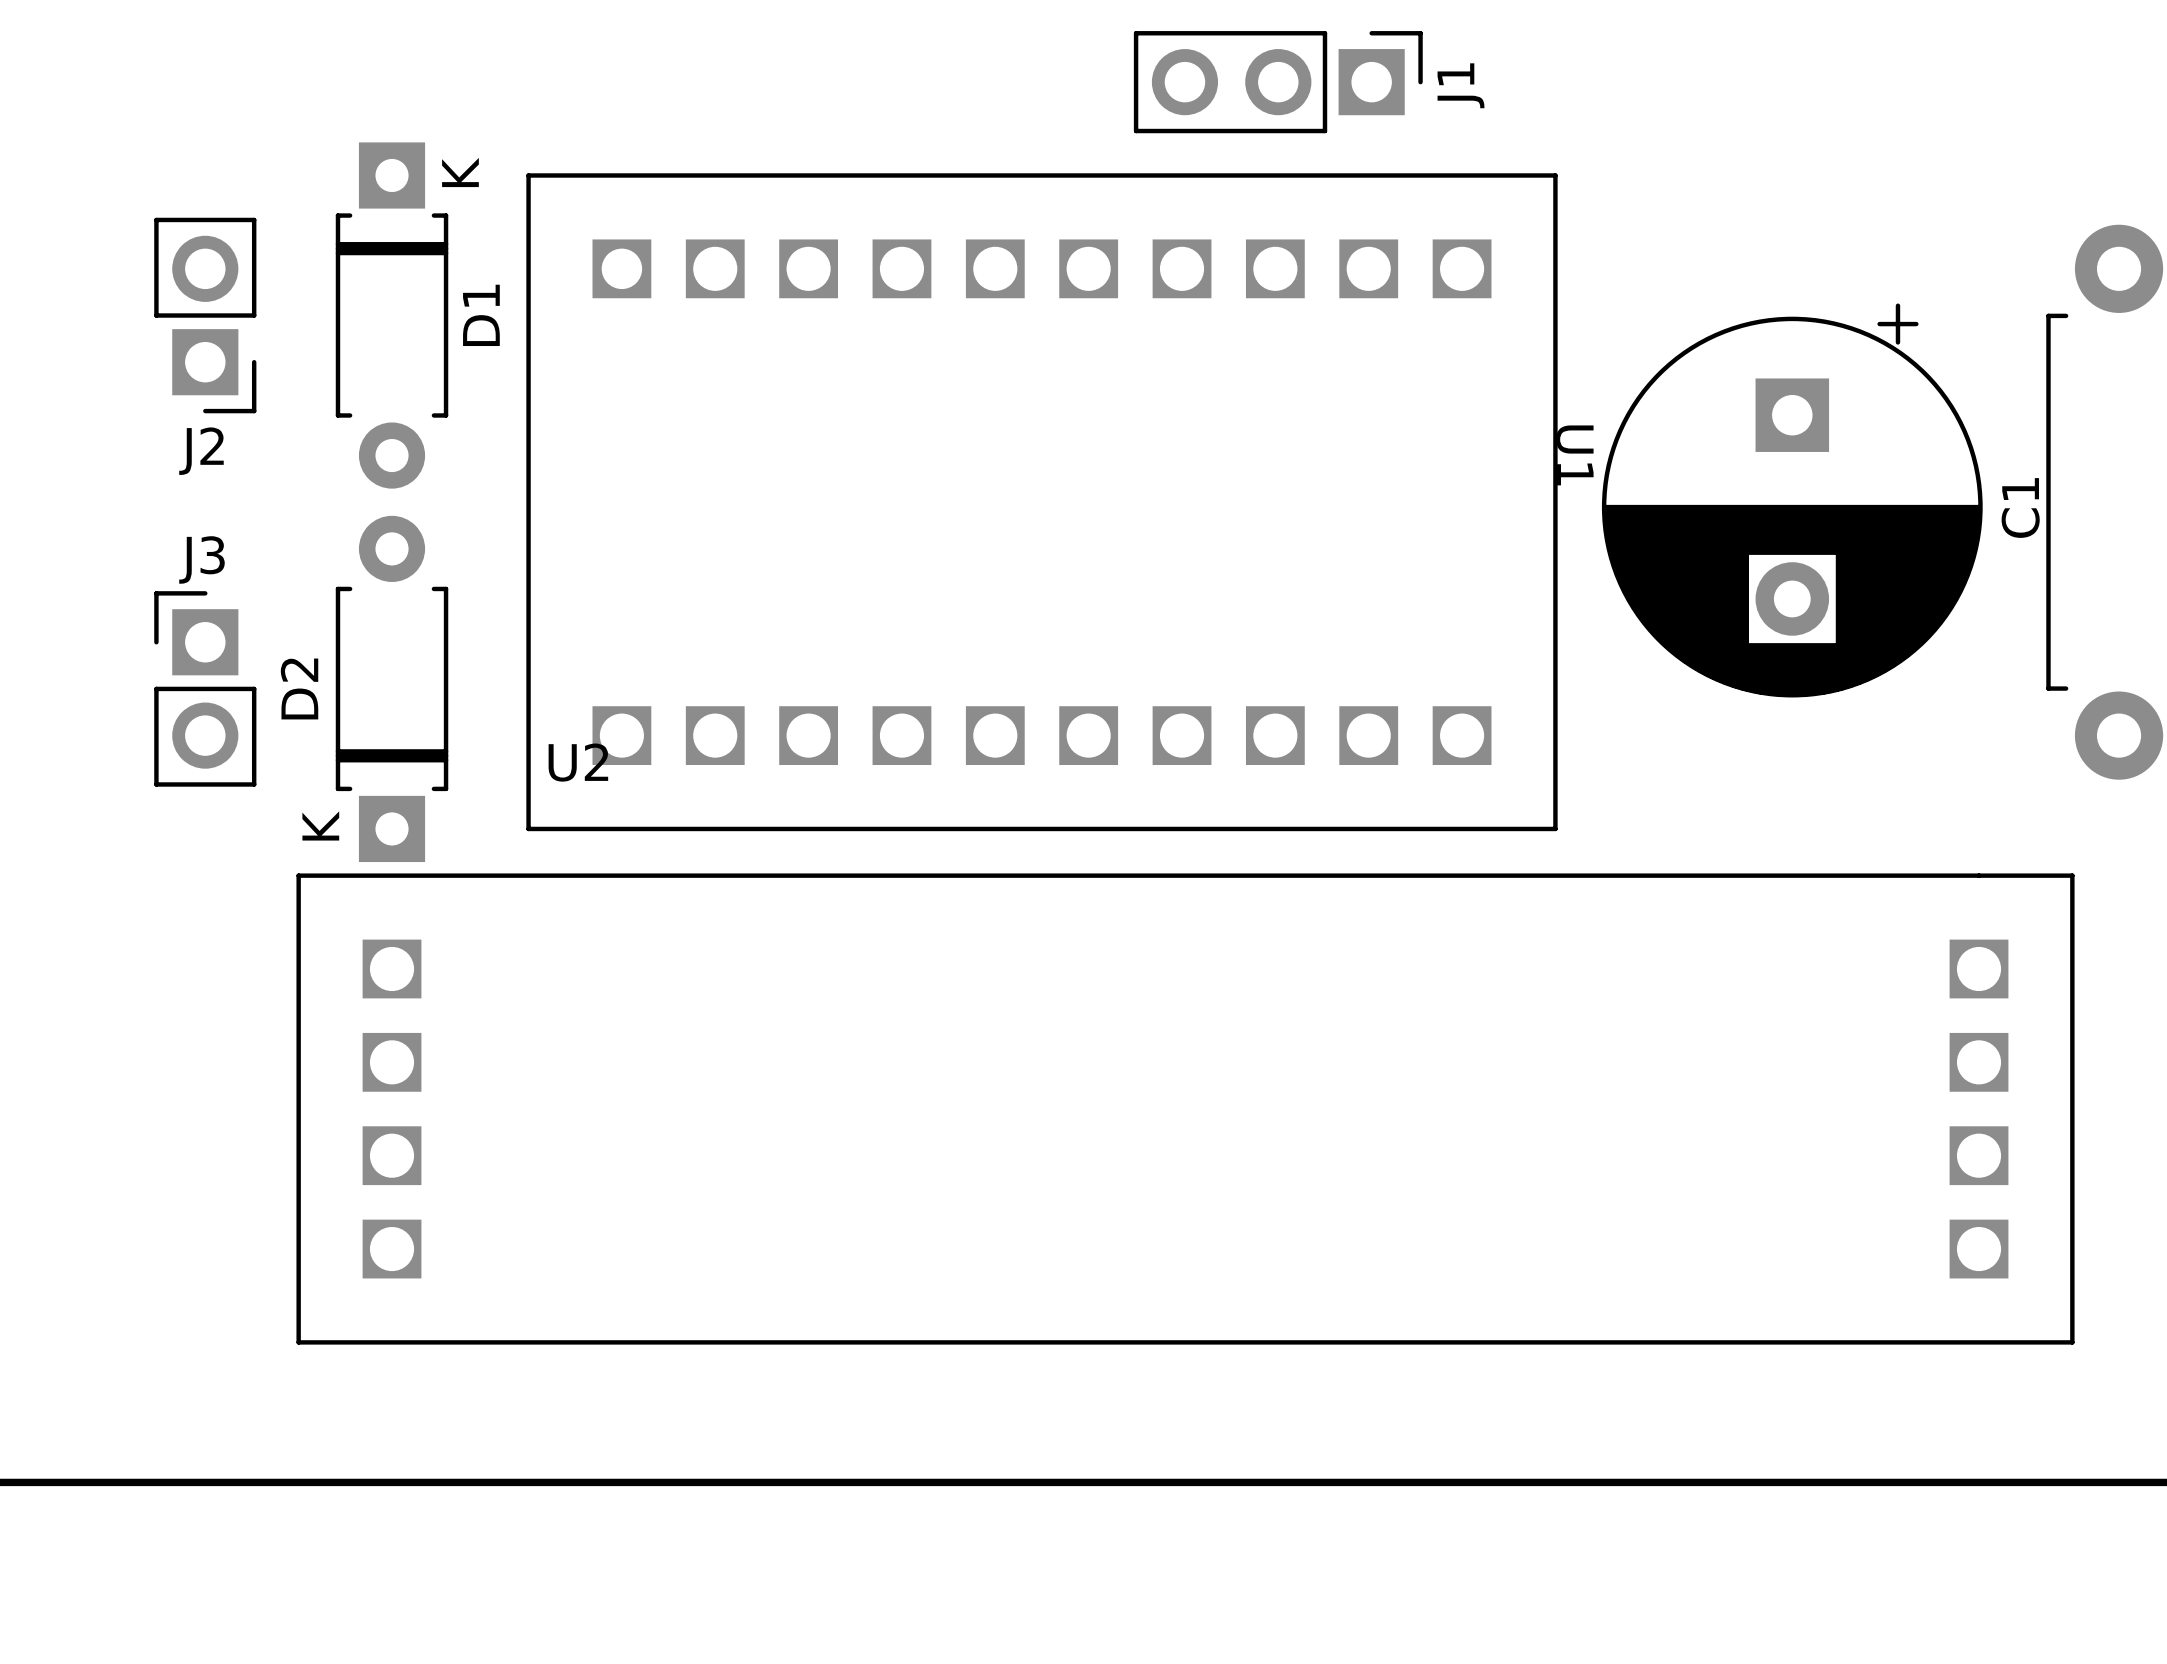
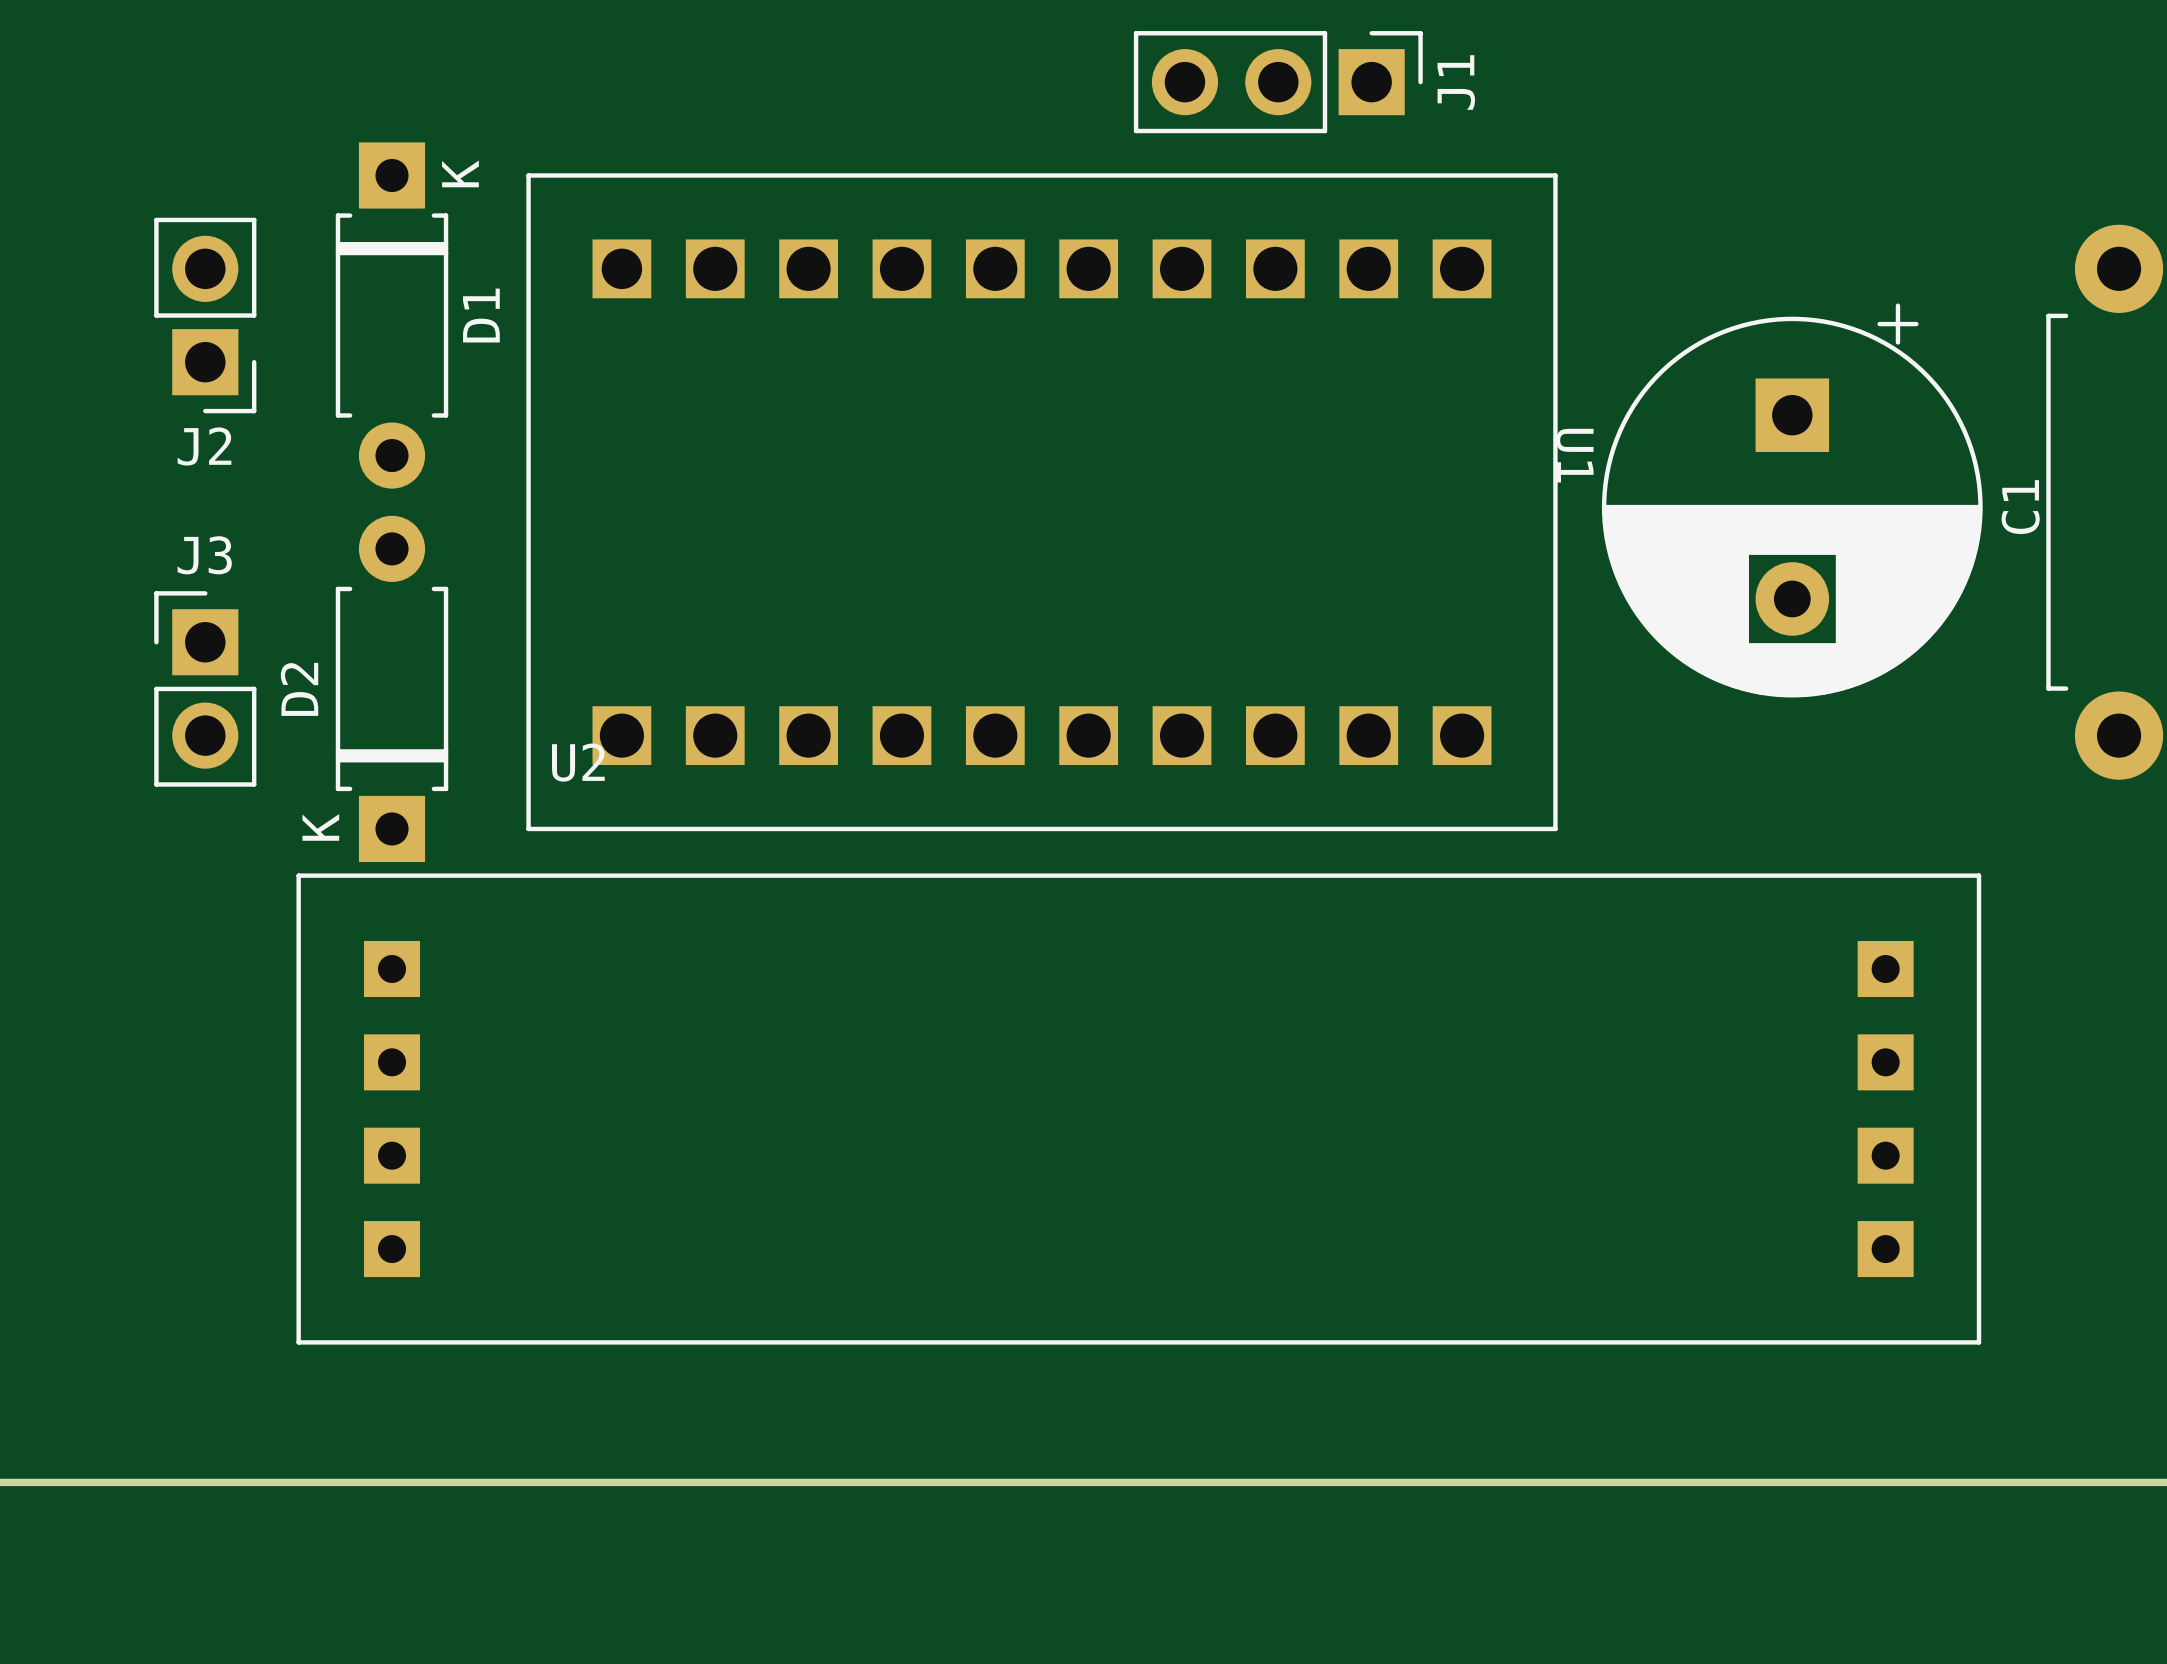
U2 footprint: [296, 873, 2075, 1345] -> [296, 873, 1982, 1345]

